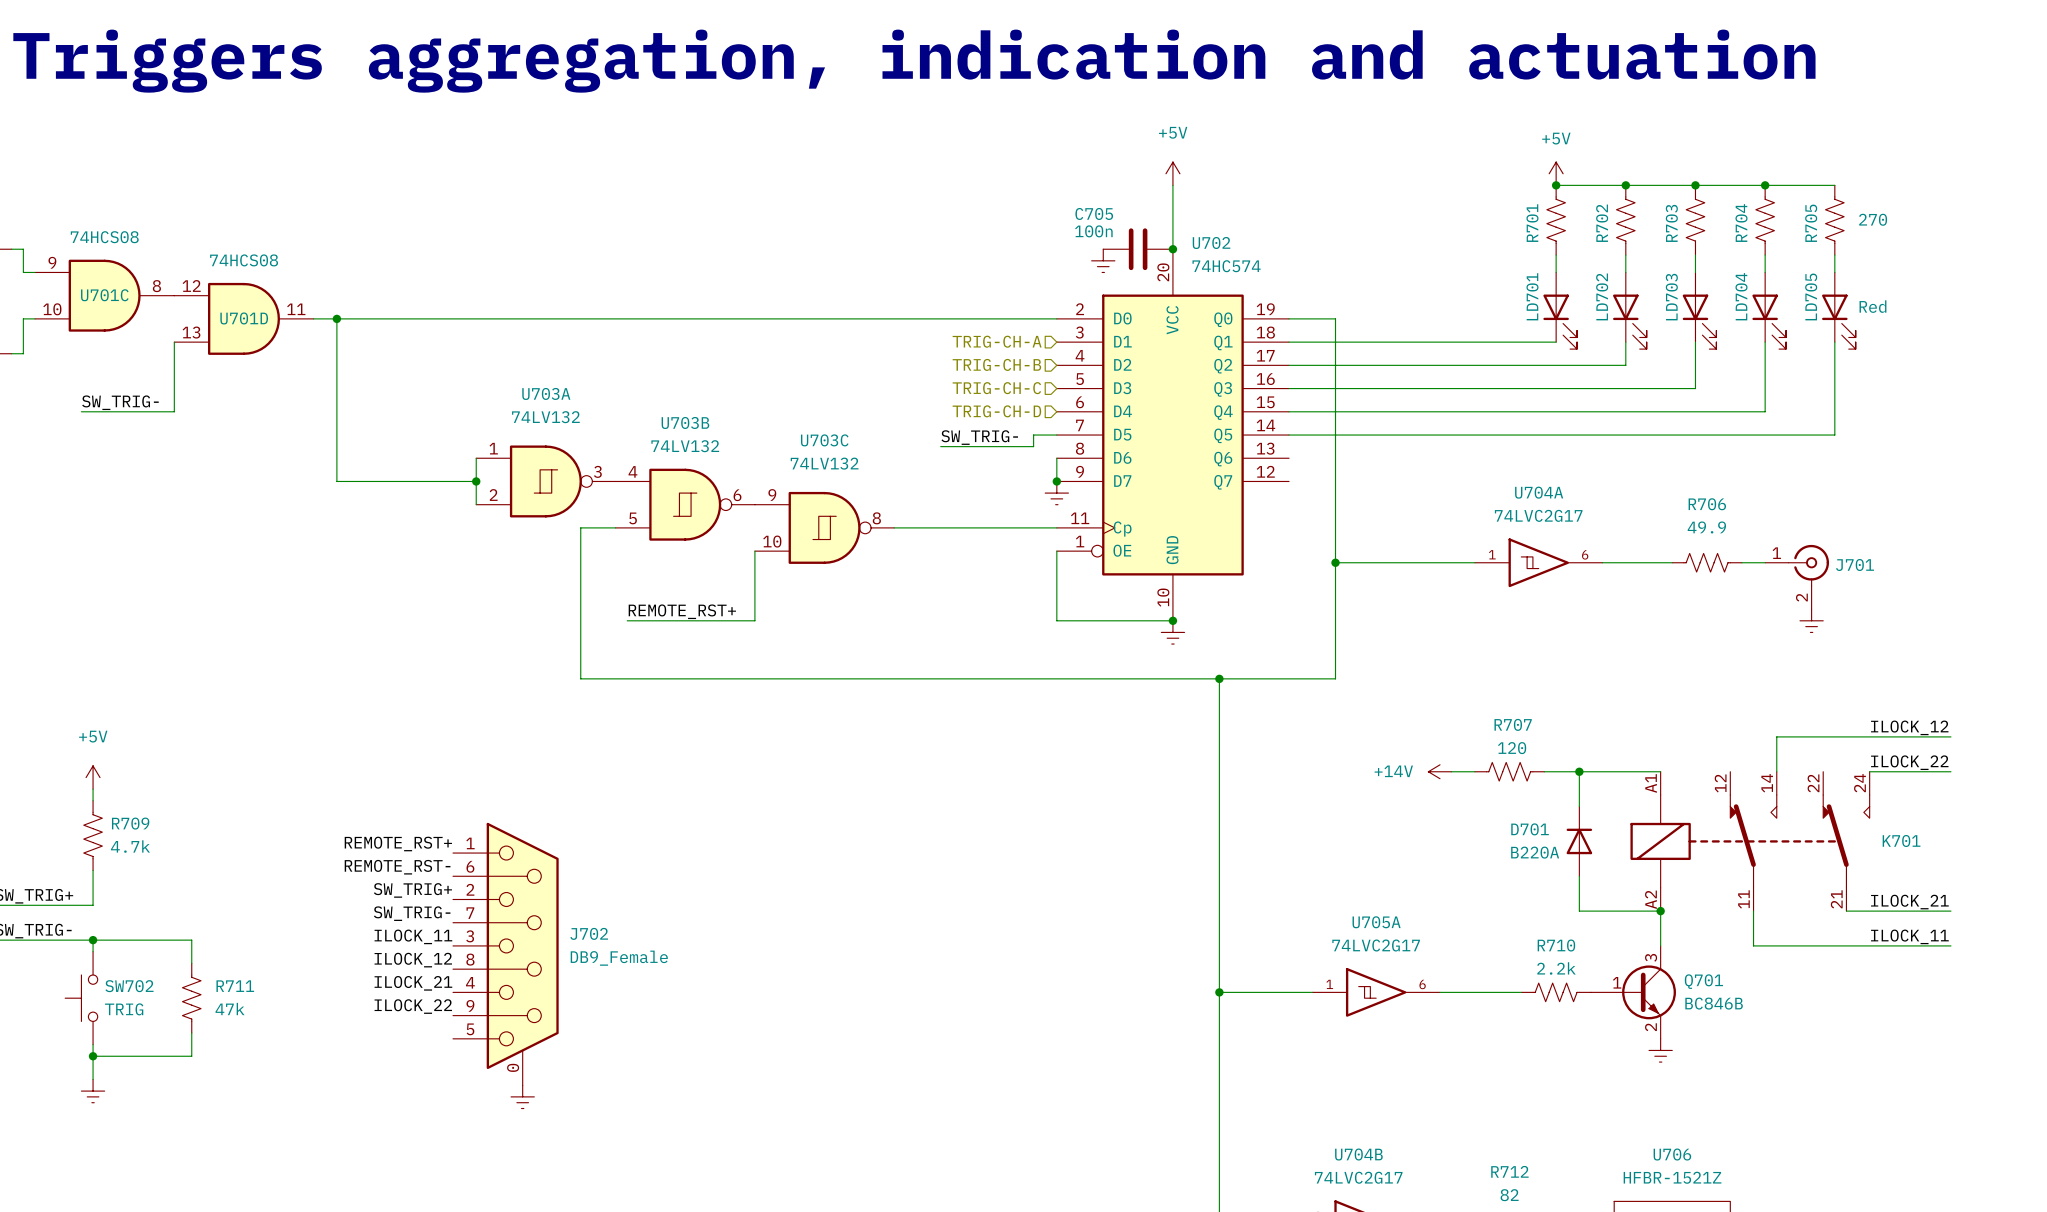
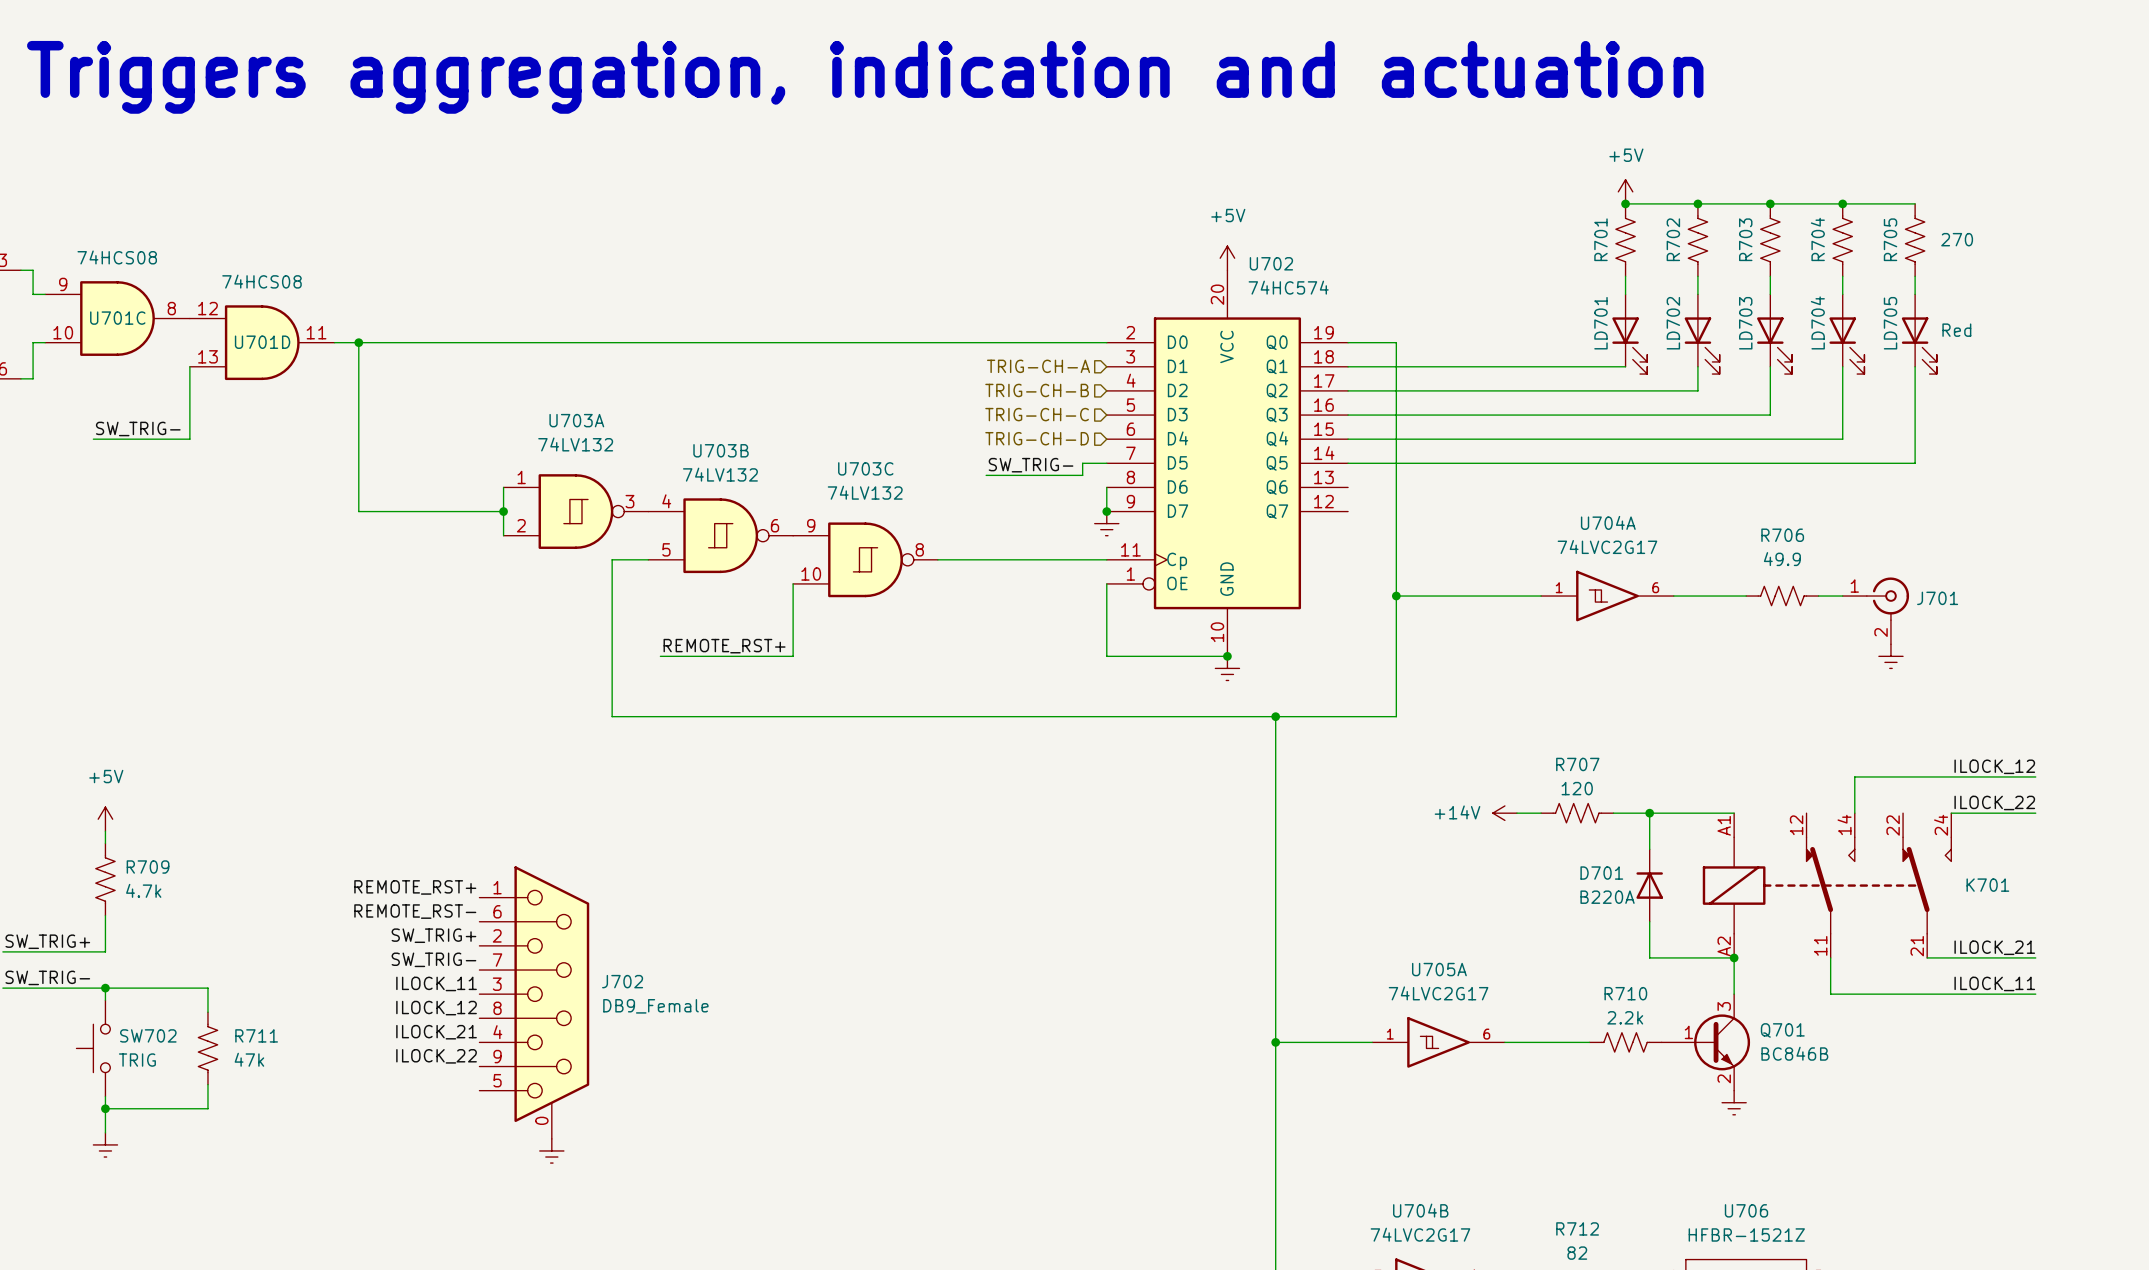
power symbol position: +5V (1172, 173) -> +5V (1227, 258)
wire: (1172, 185) (1172, 249) -> none
C705: 100n (1138, 249) -> none
junction: (1172, 249) -> none
power symbol: (1103, 260) -> none

